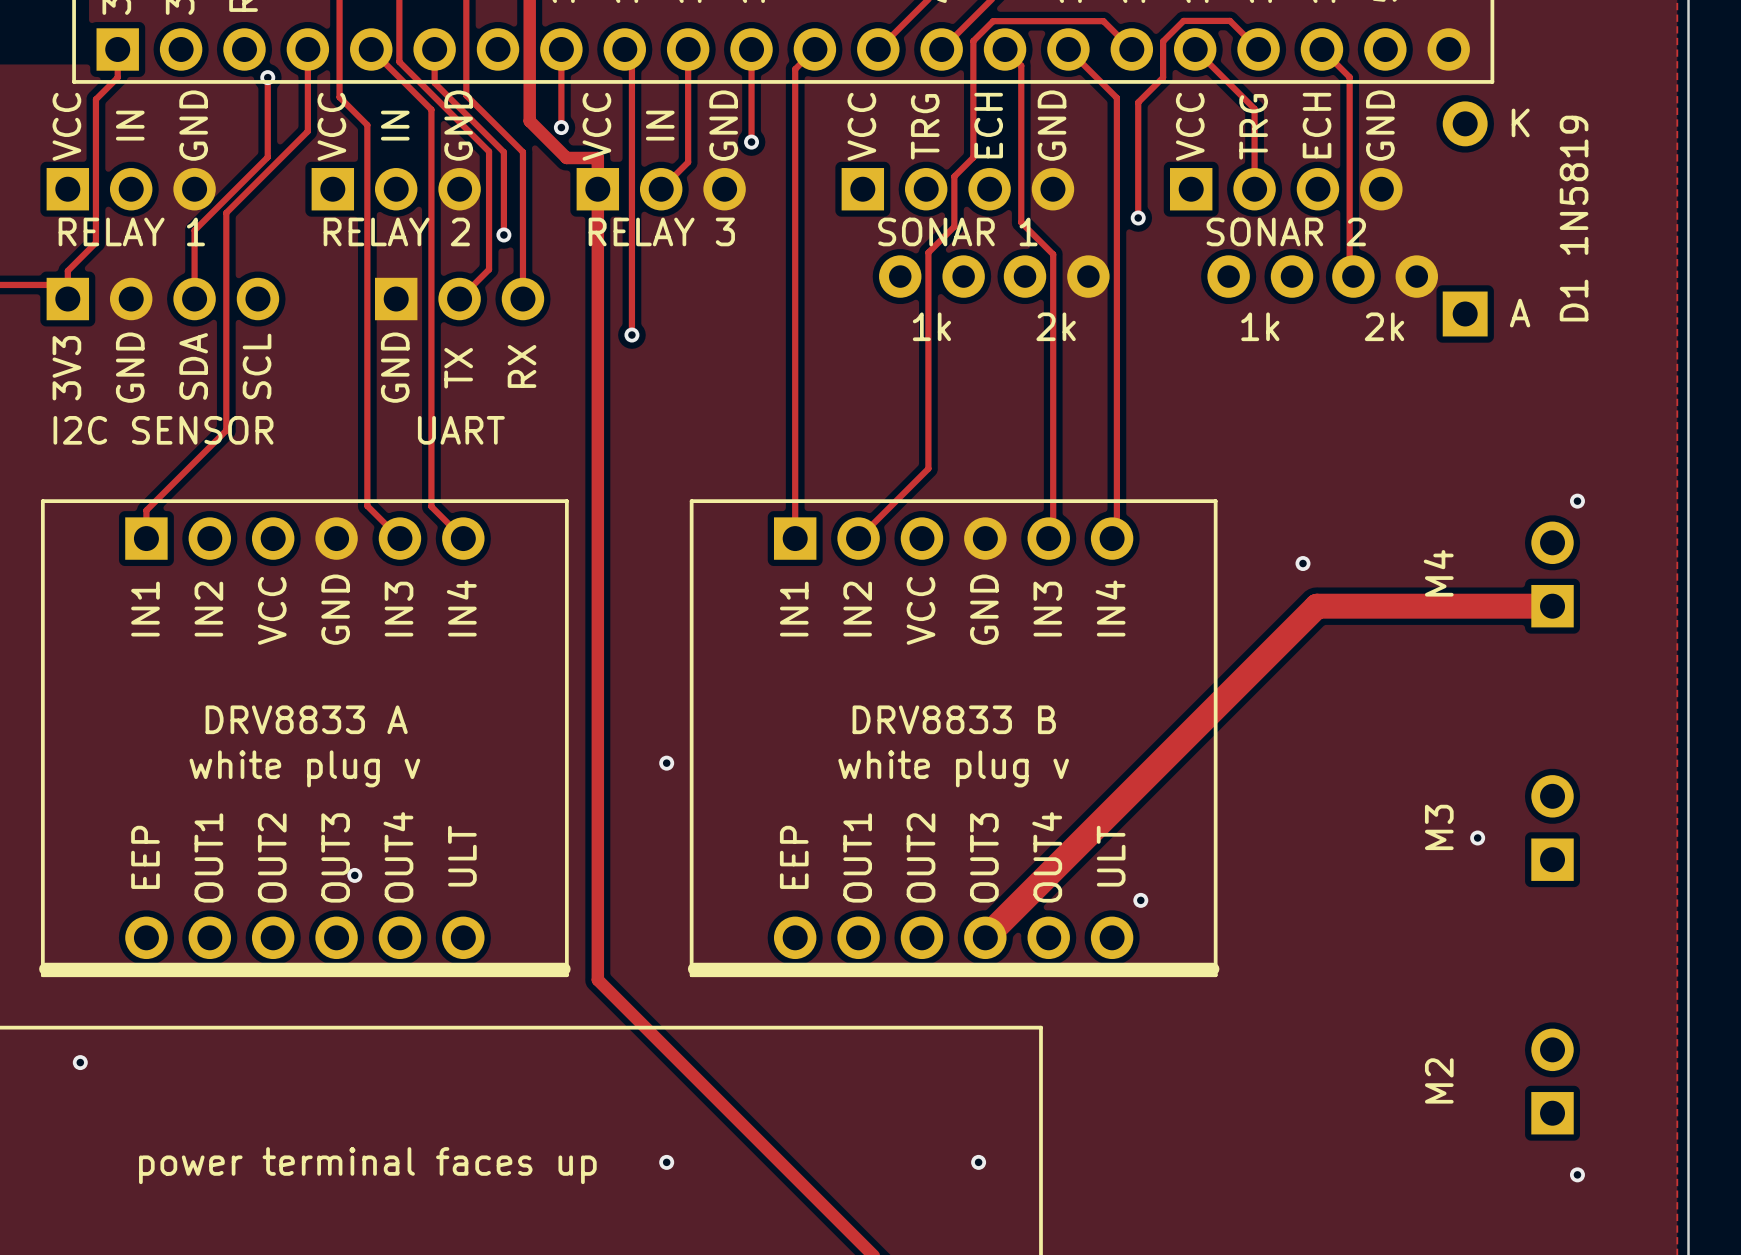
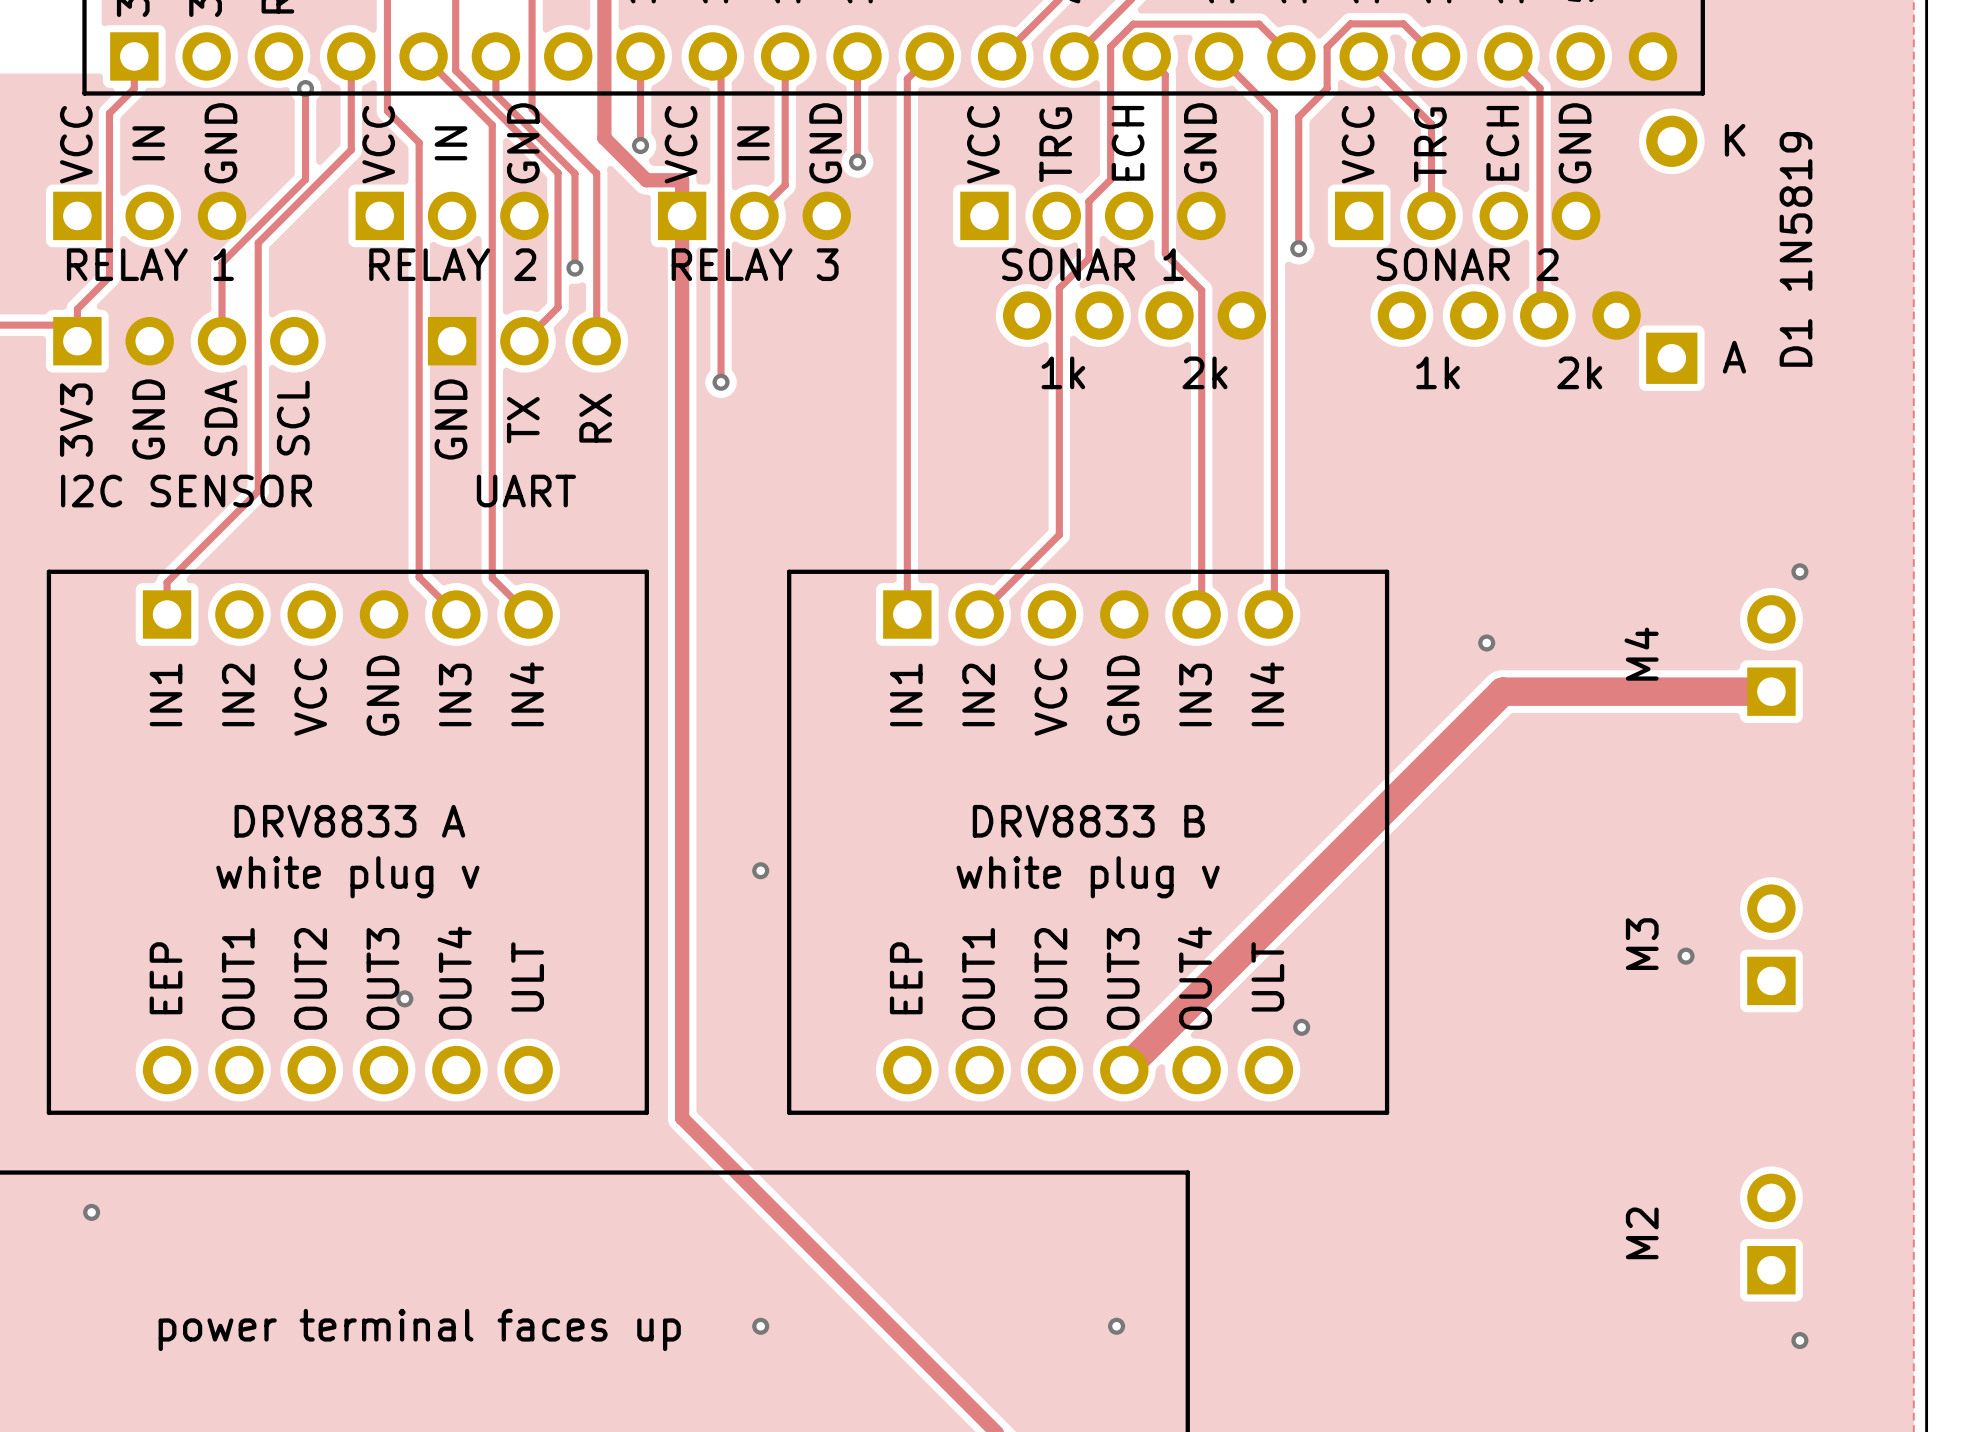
line: (45, 969) (564, 969) -> none
line: (694, 969) (1213, 969) -> none

